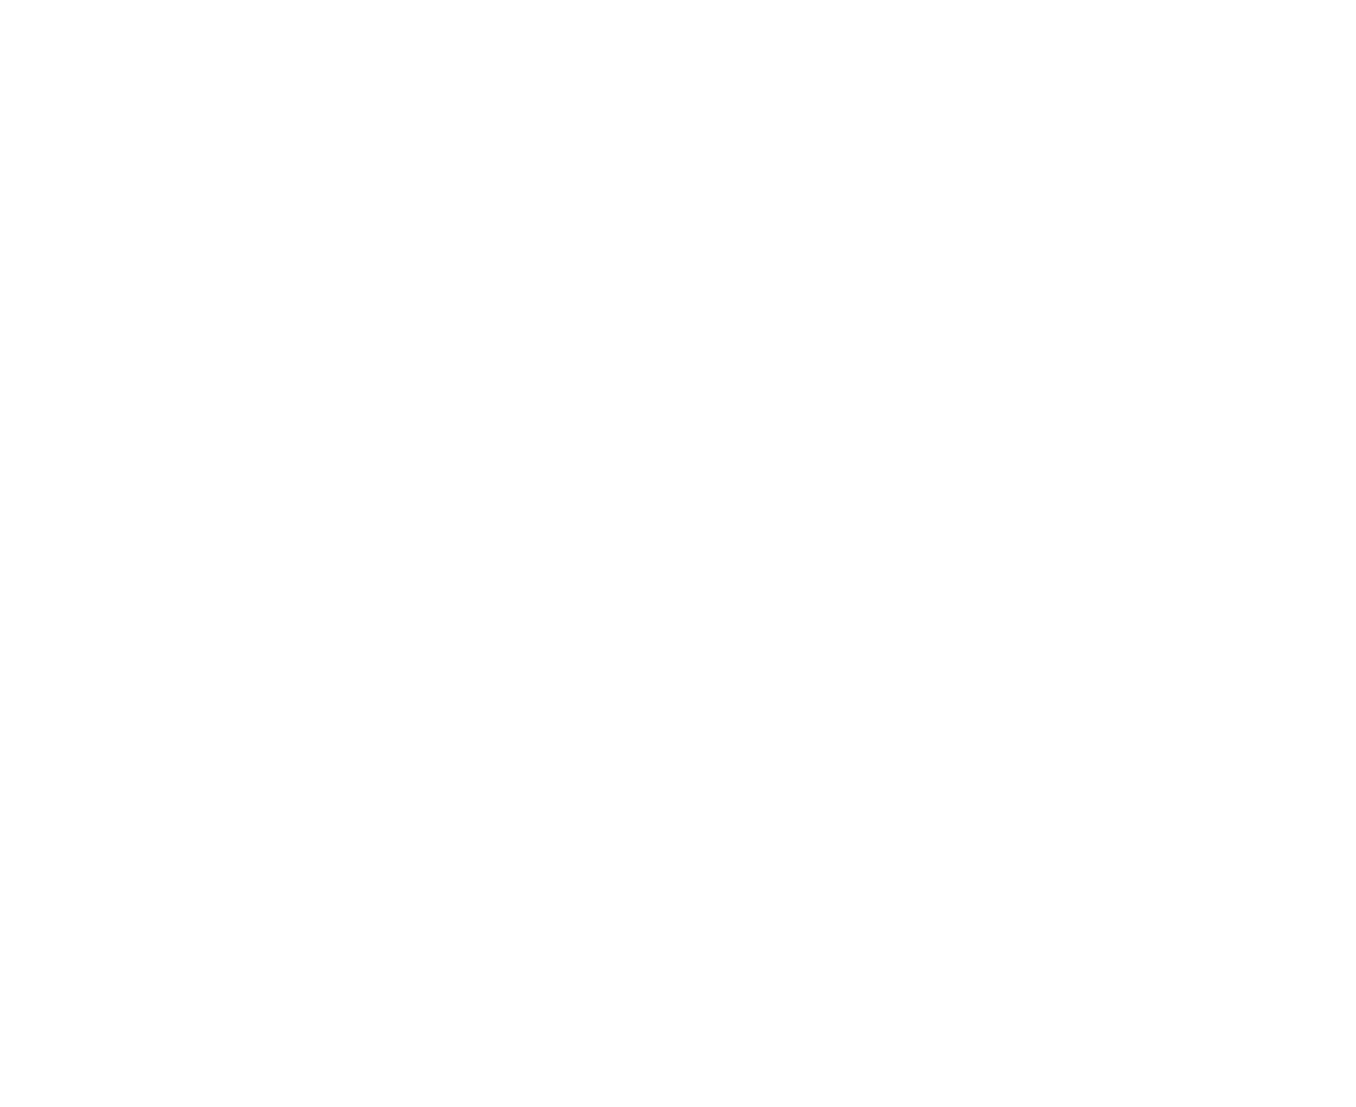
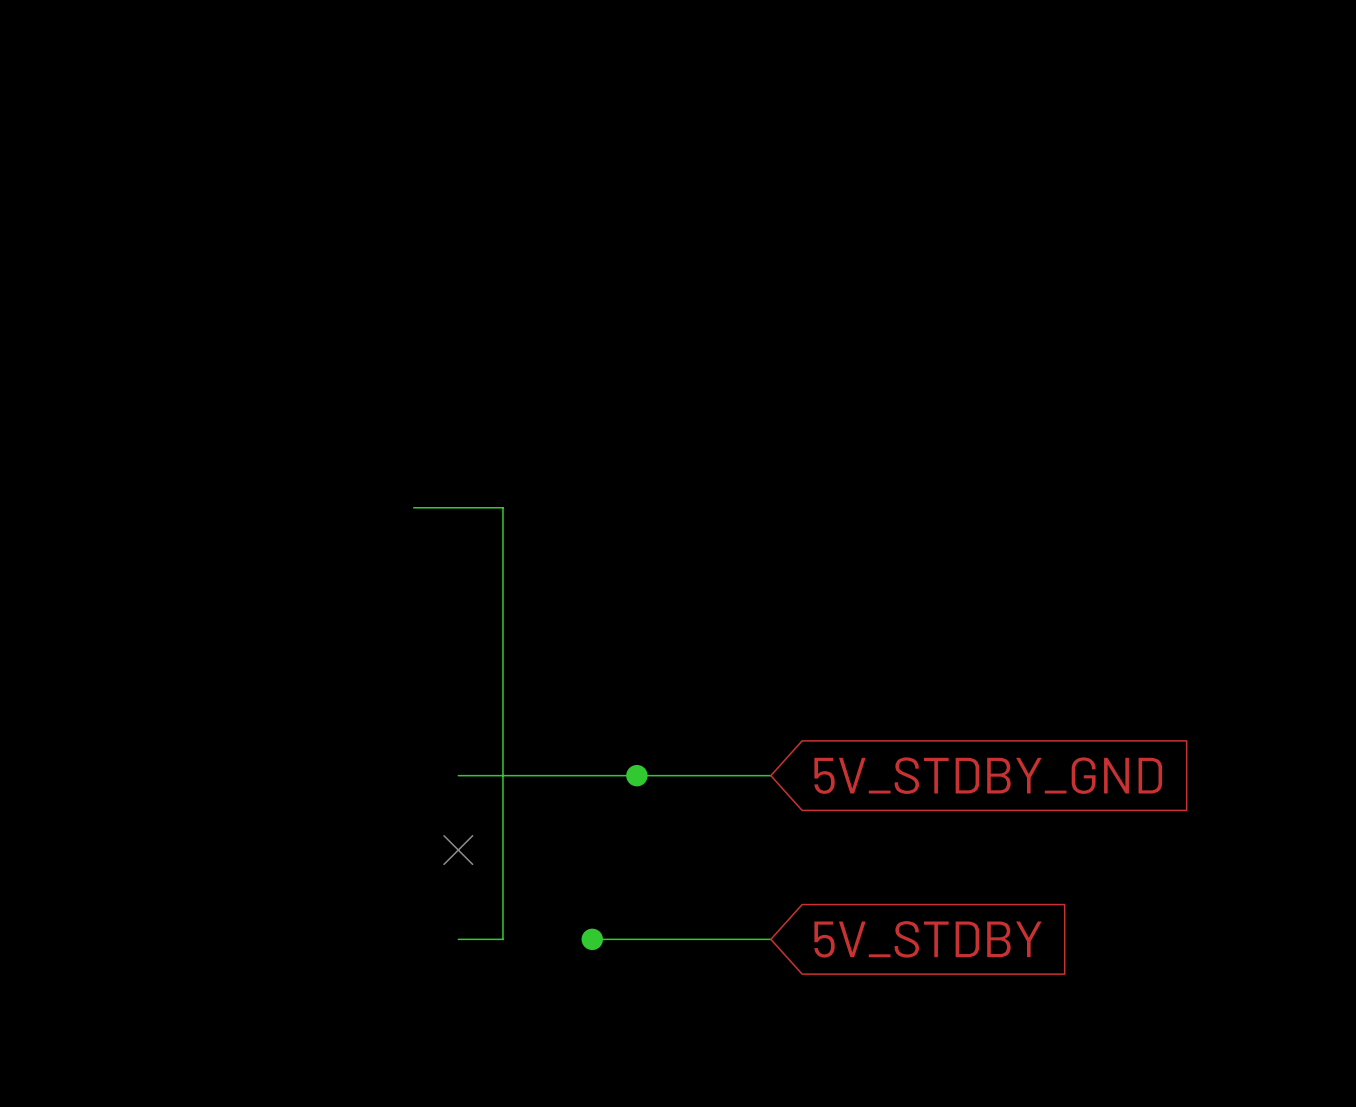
wire: none -> (413, 507) (502, 507) (502, 939) (458, 939)
wire: none -> (458, 775) (770, 775)
junction: none -> (636, 775)
global label: none -> 5V_STDBY_GND (988, 775)
no-connect mark: none -> (458, 850)
wire: none -> (592, 939) (770, 939)
junction: none -> (592, 939)
global label: none -> 5V_STDBY (927, 939)

